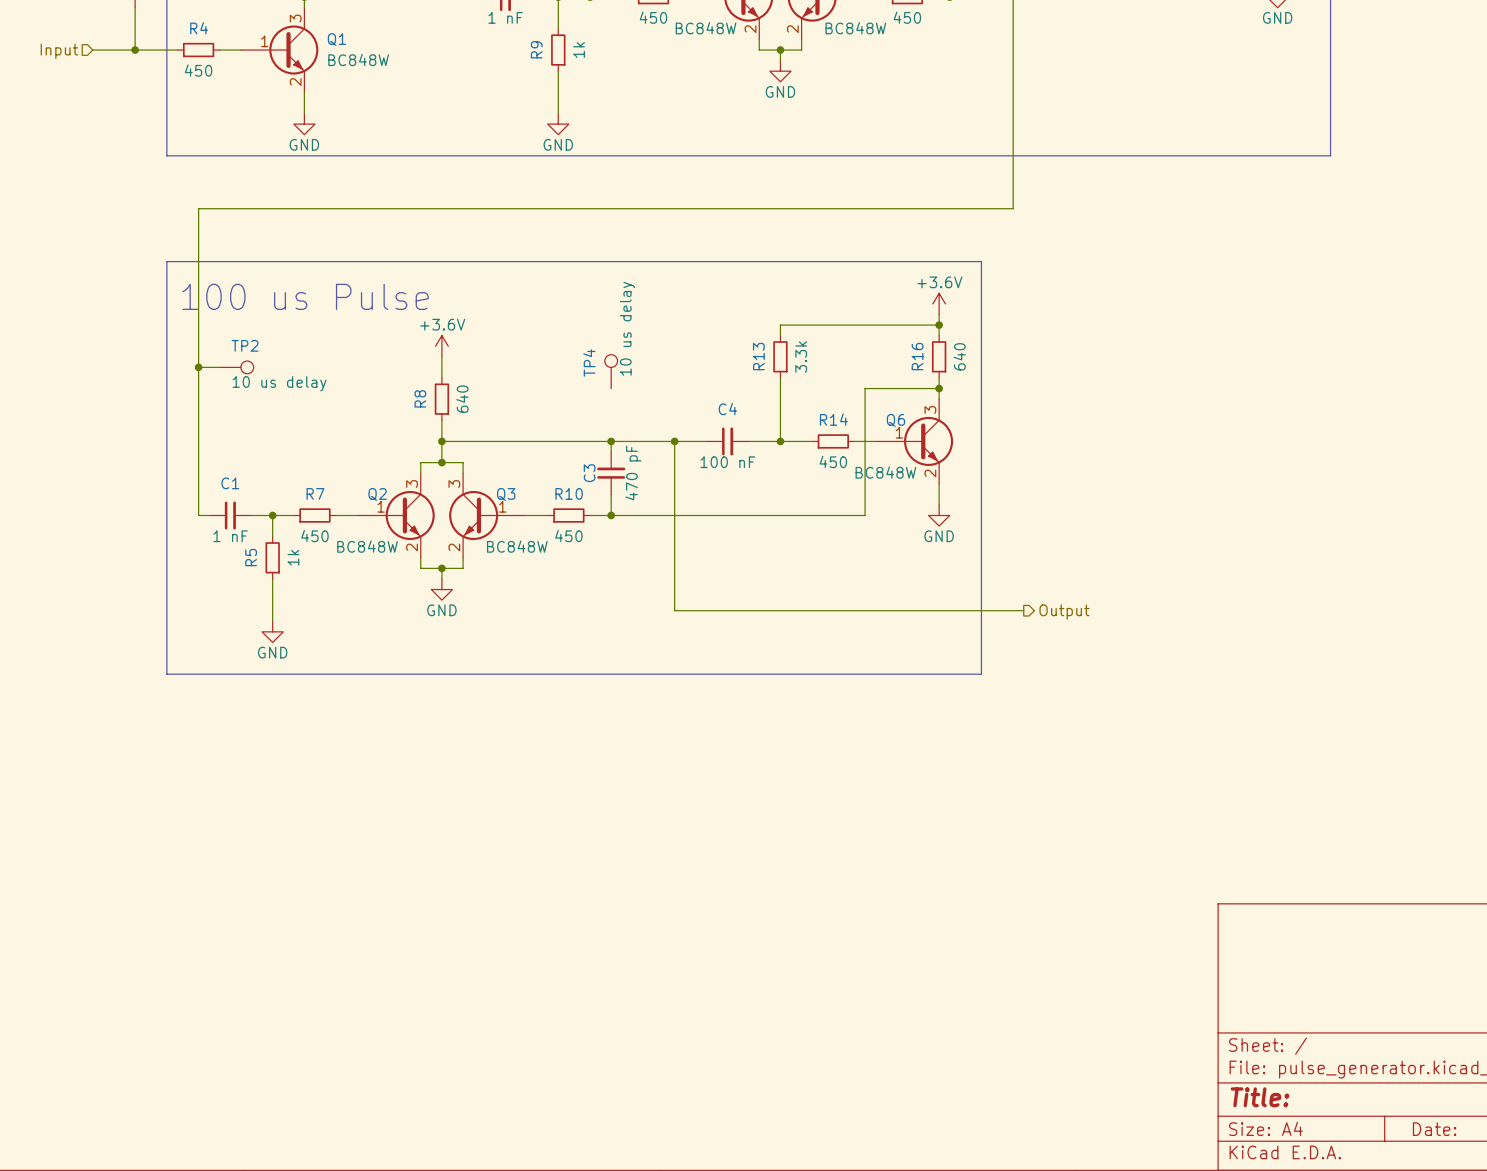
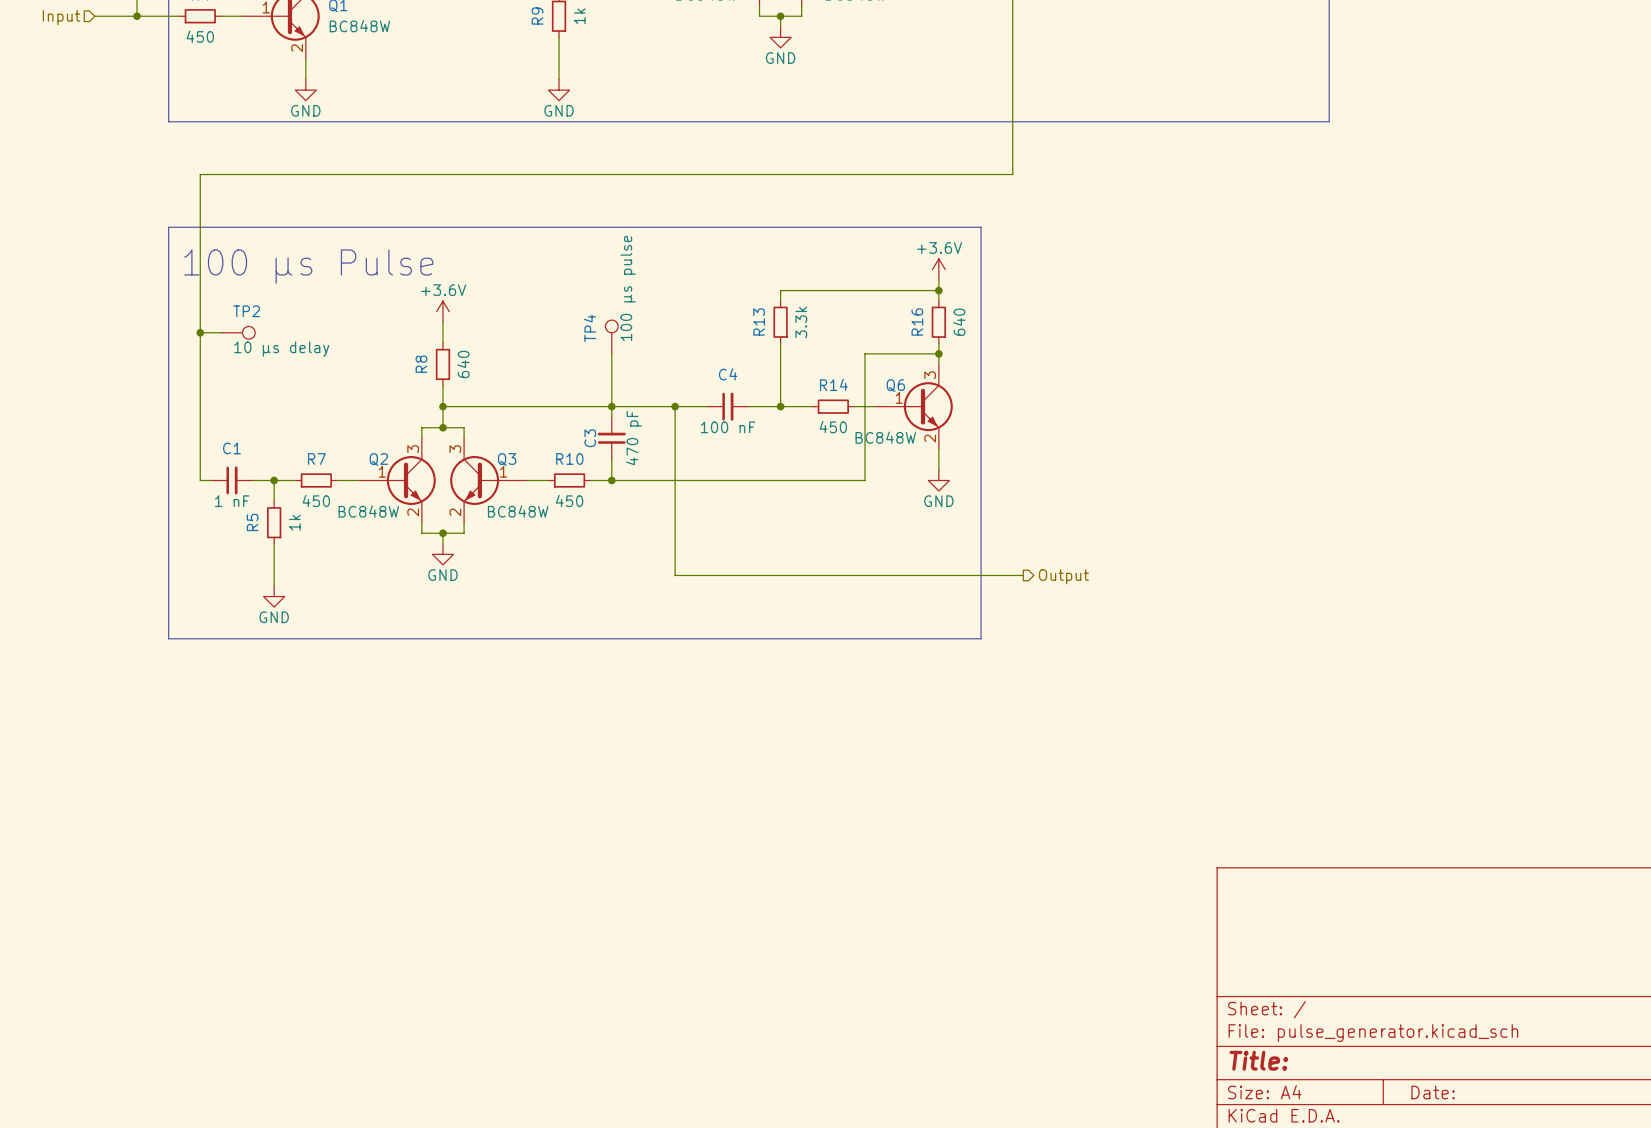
text: 100 us Pulse (305, 296) -> 100 μs Pulse (308, 266)
TP4 value: 10 us delay (627, 328) -> 100 μs pulse (628, 288)
TP2 value: 10 us delay (279, 383) -> 10 μs delay (281, 349)
wire: none -> (611, 353) (611, 406)

